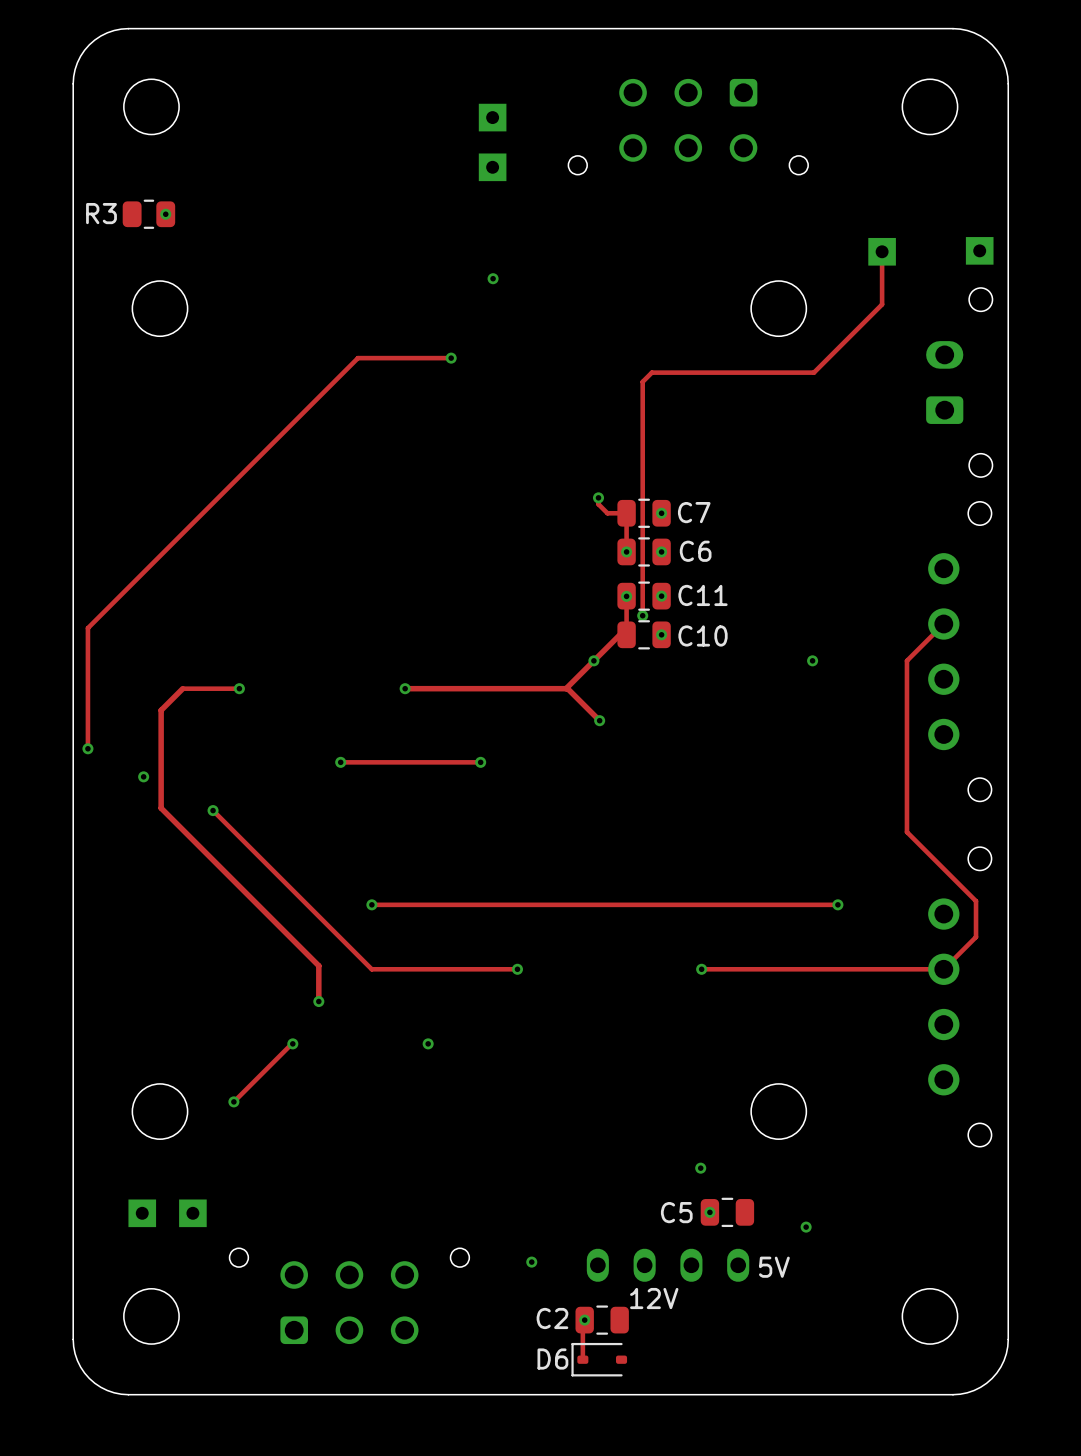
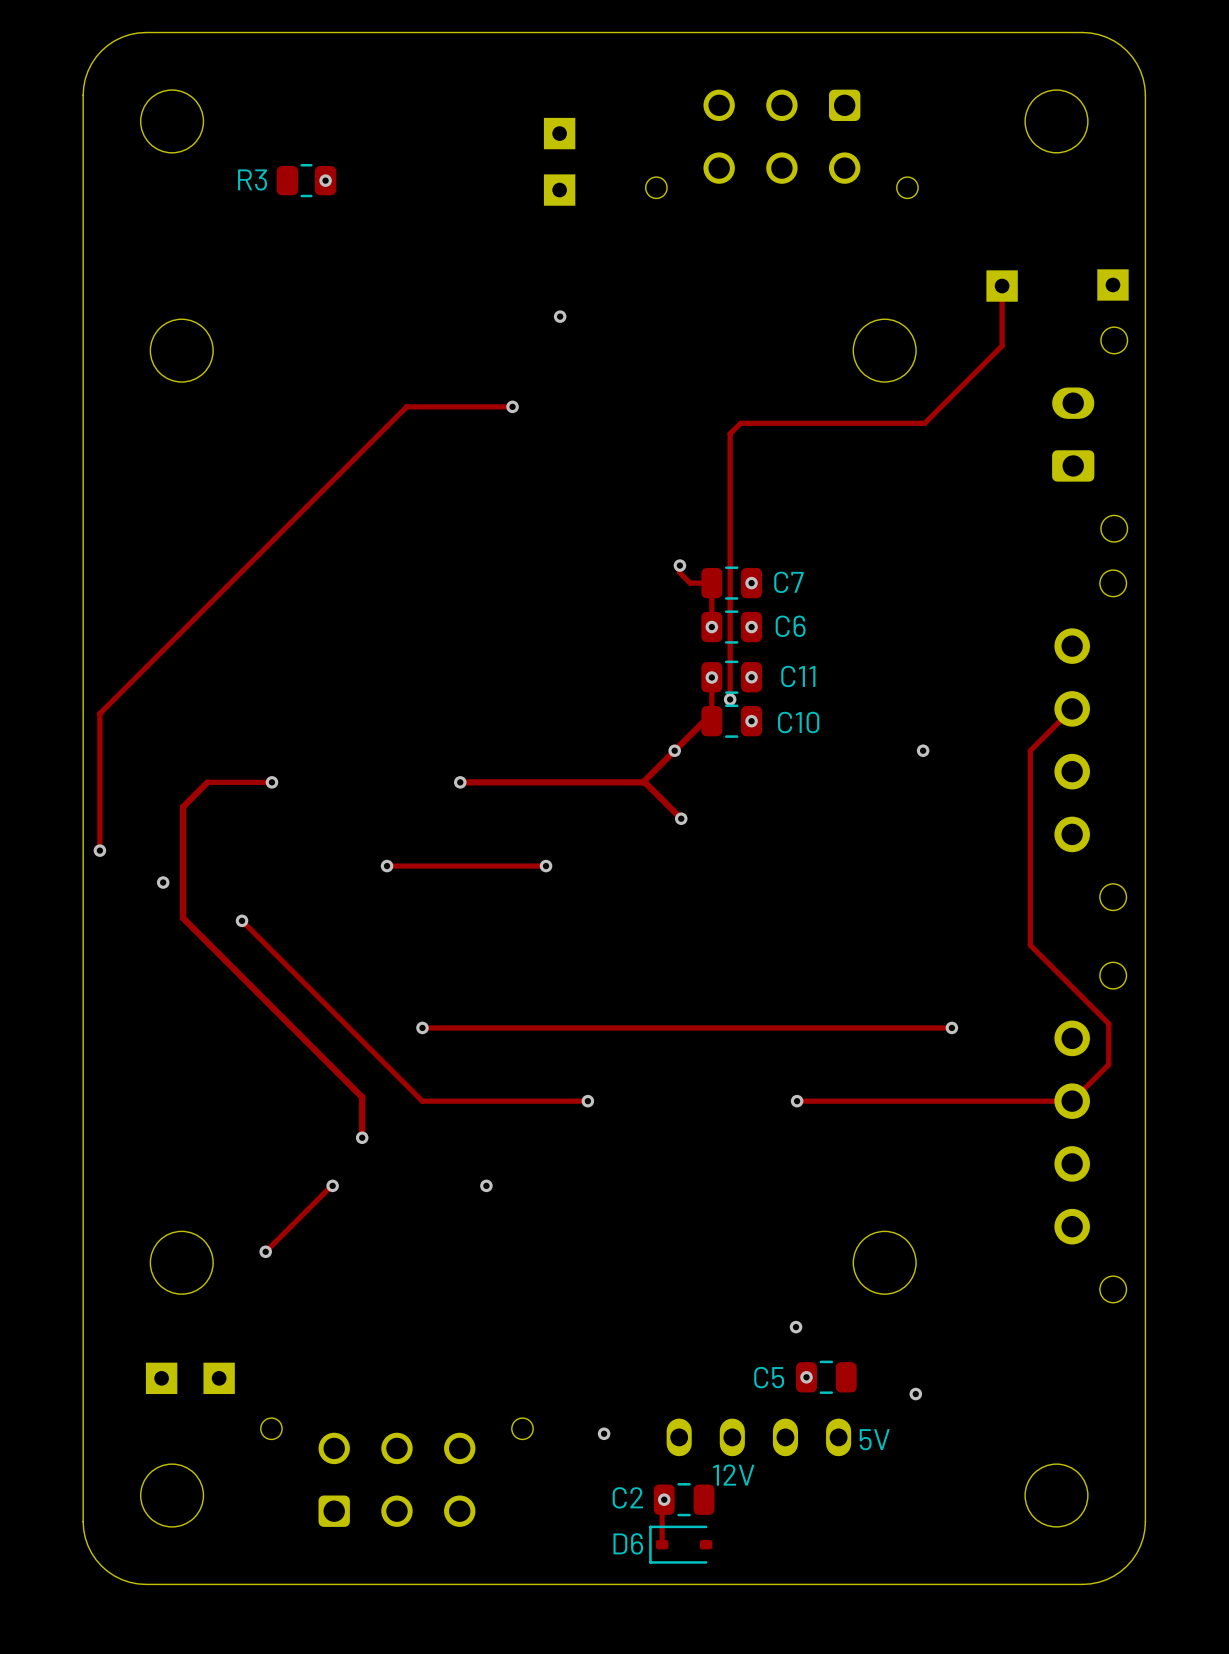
via: none -> (325, 180)
R3 position: (148, 214) -> (306, 180)
via: (165, 214) -> none

